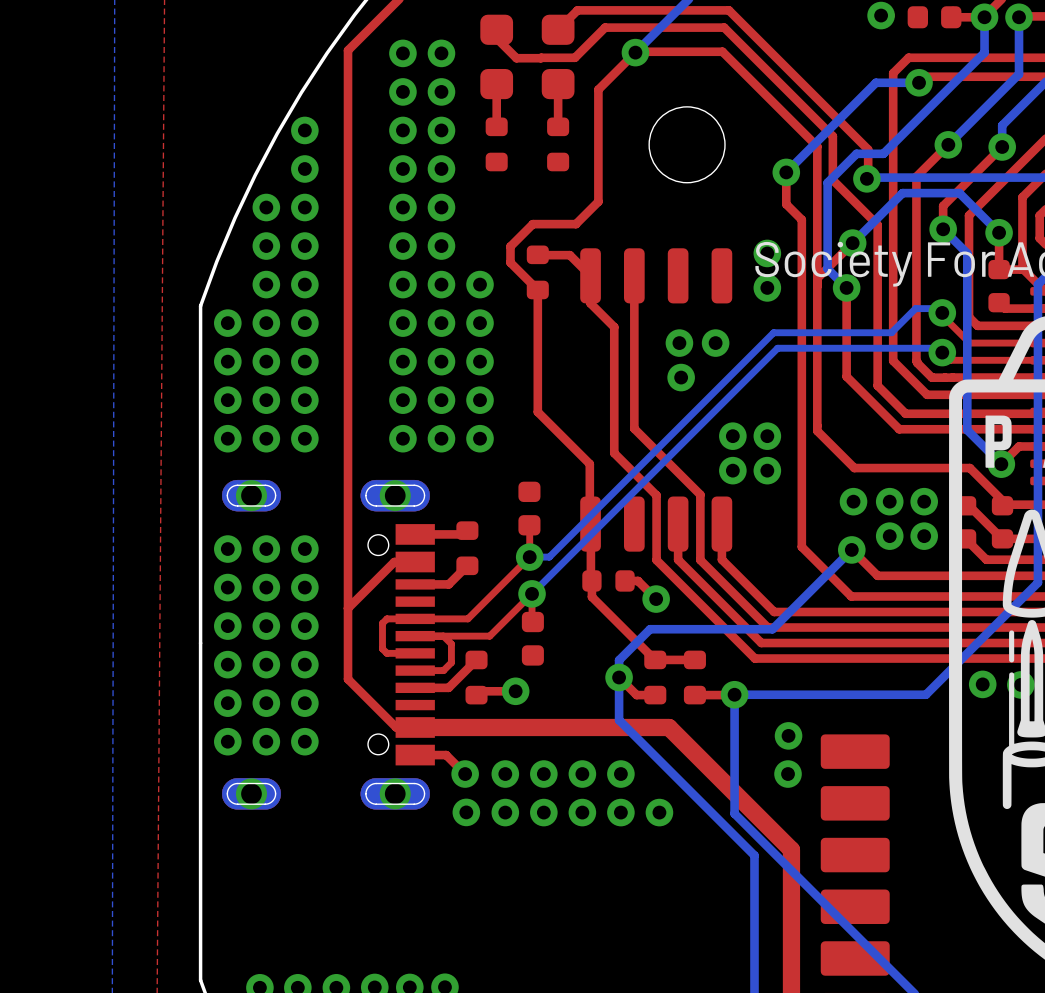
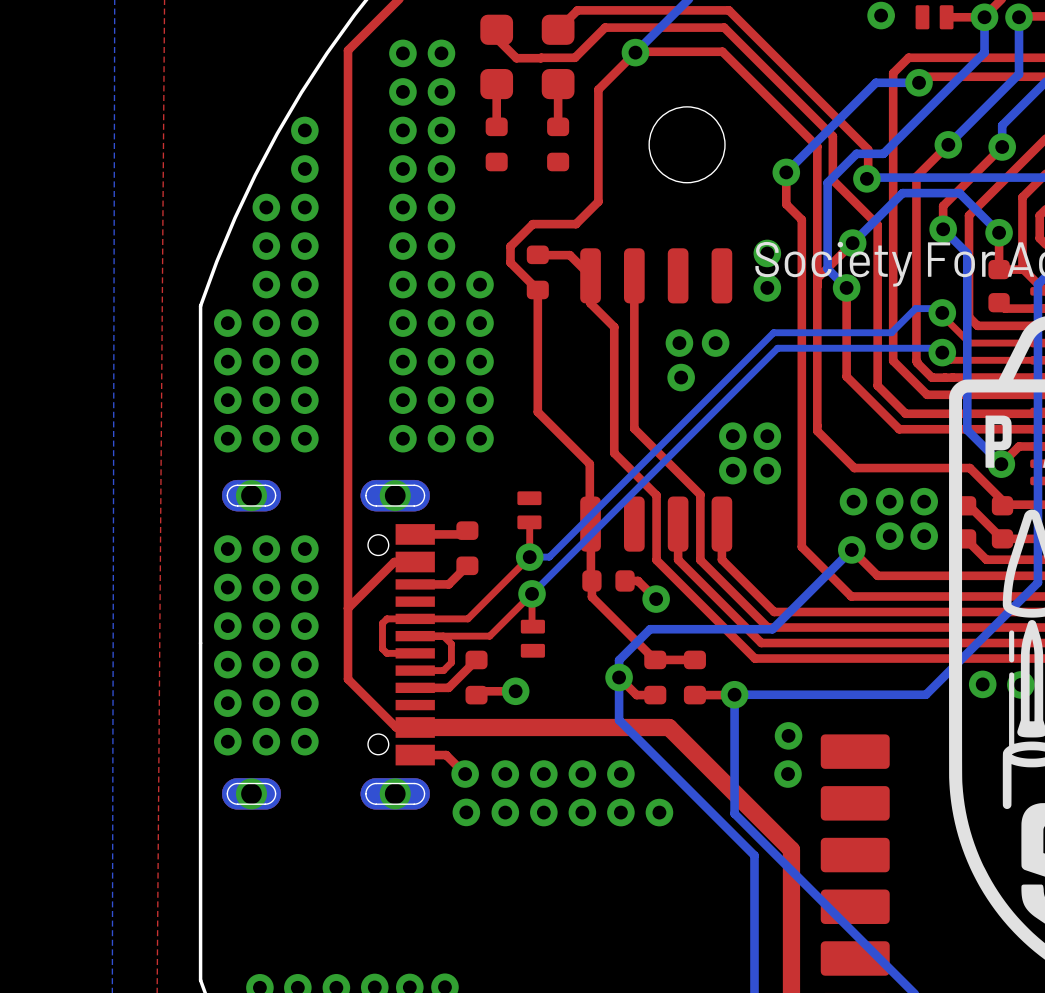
part footprint: [907, 6, 962, 29] -> [915, 5, 954, 30]
part footprint: [518, 481, 541, 536] -> [517, 491, 542, 530]
part footprint: [521, 611, 544, 666] -> [520, 619, 545, 658]

